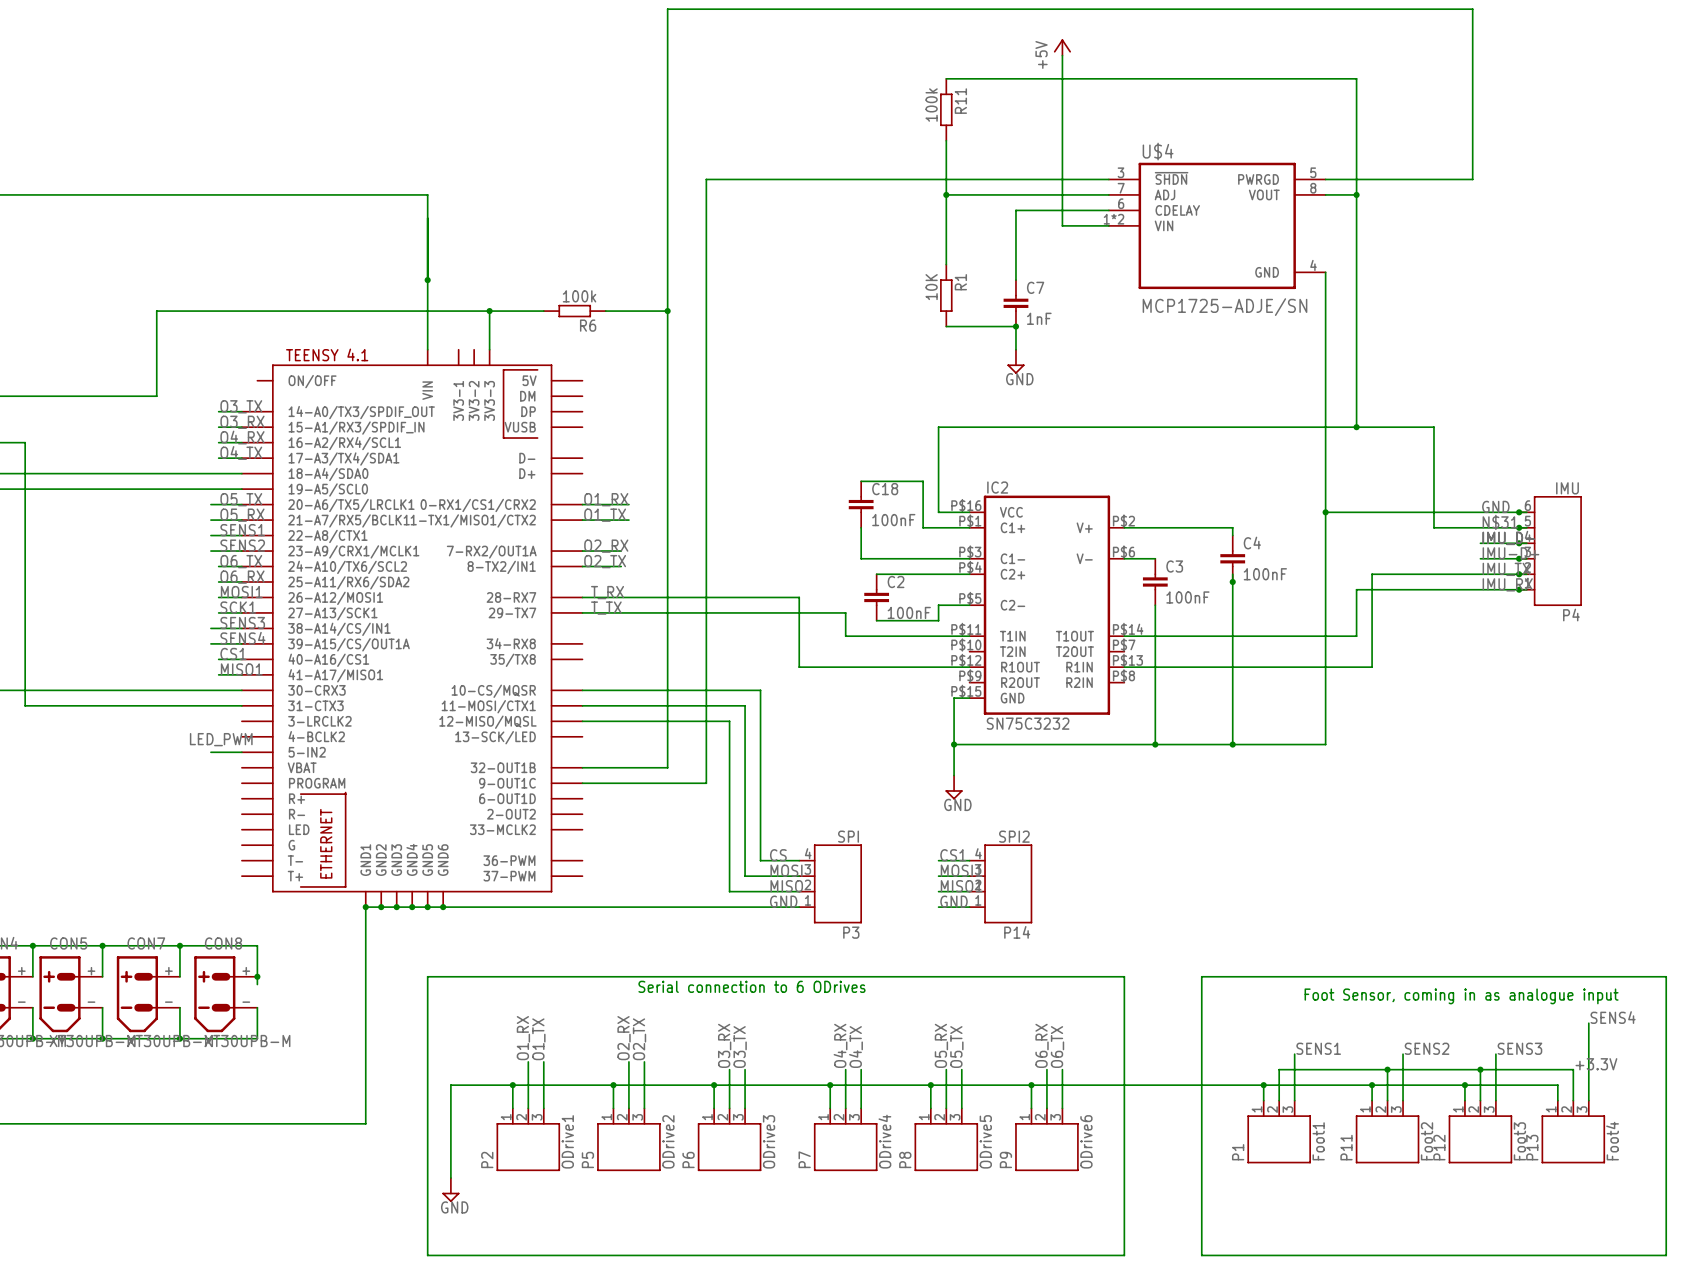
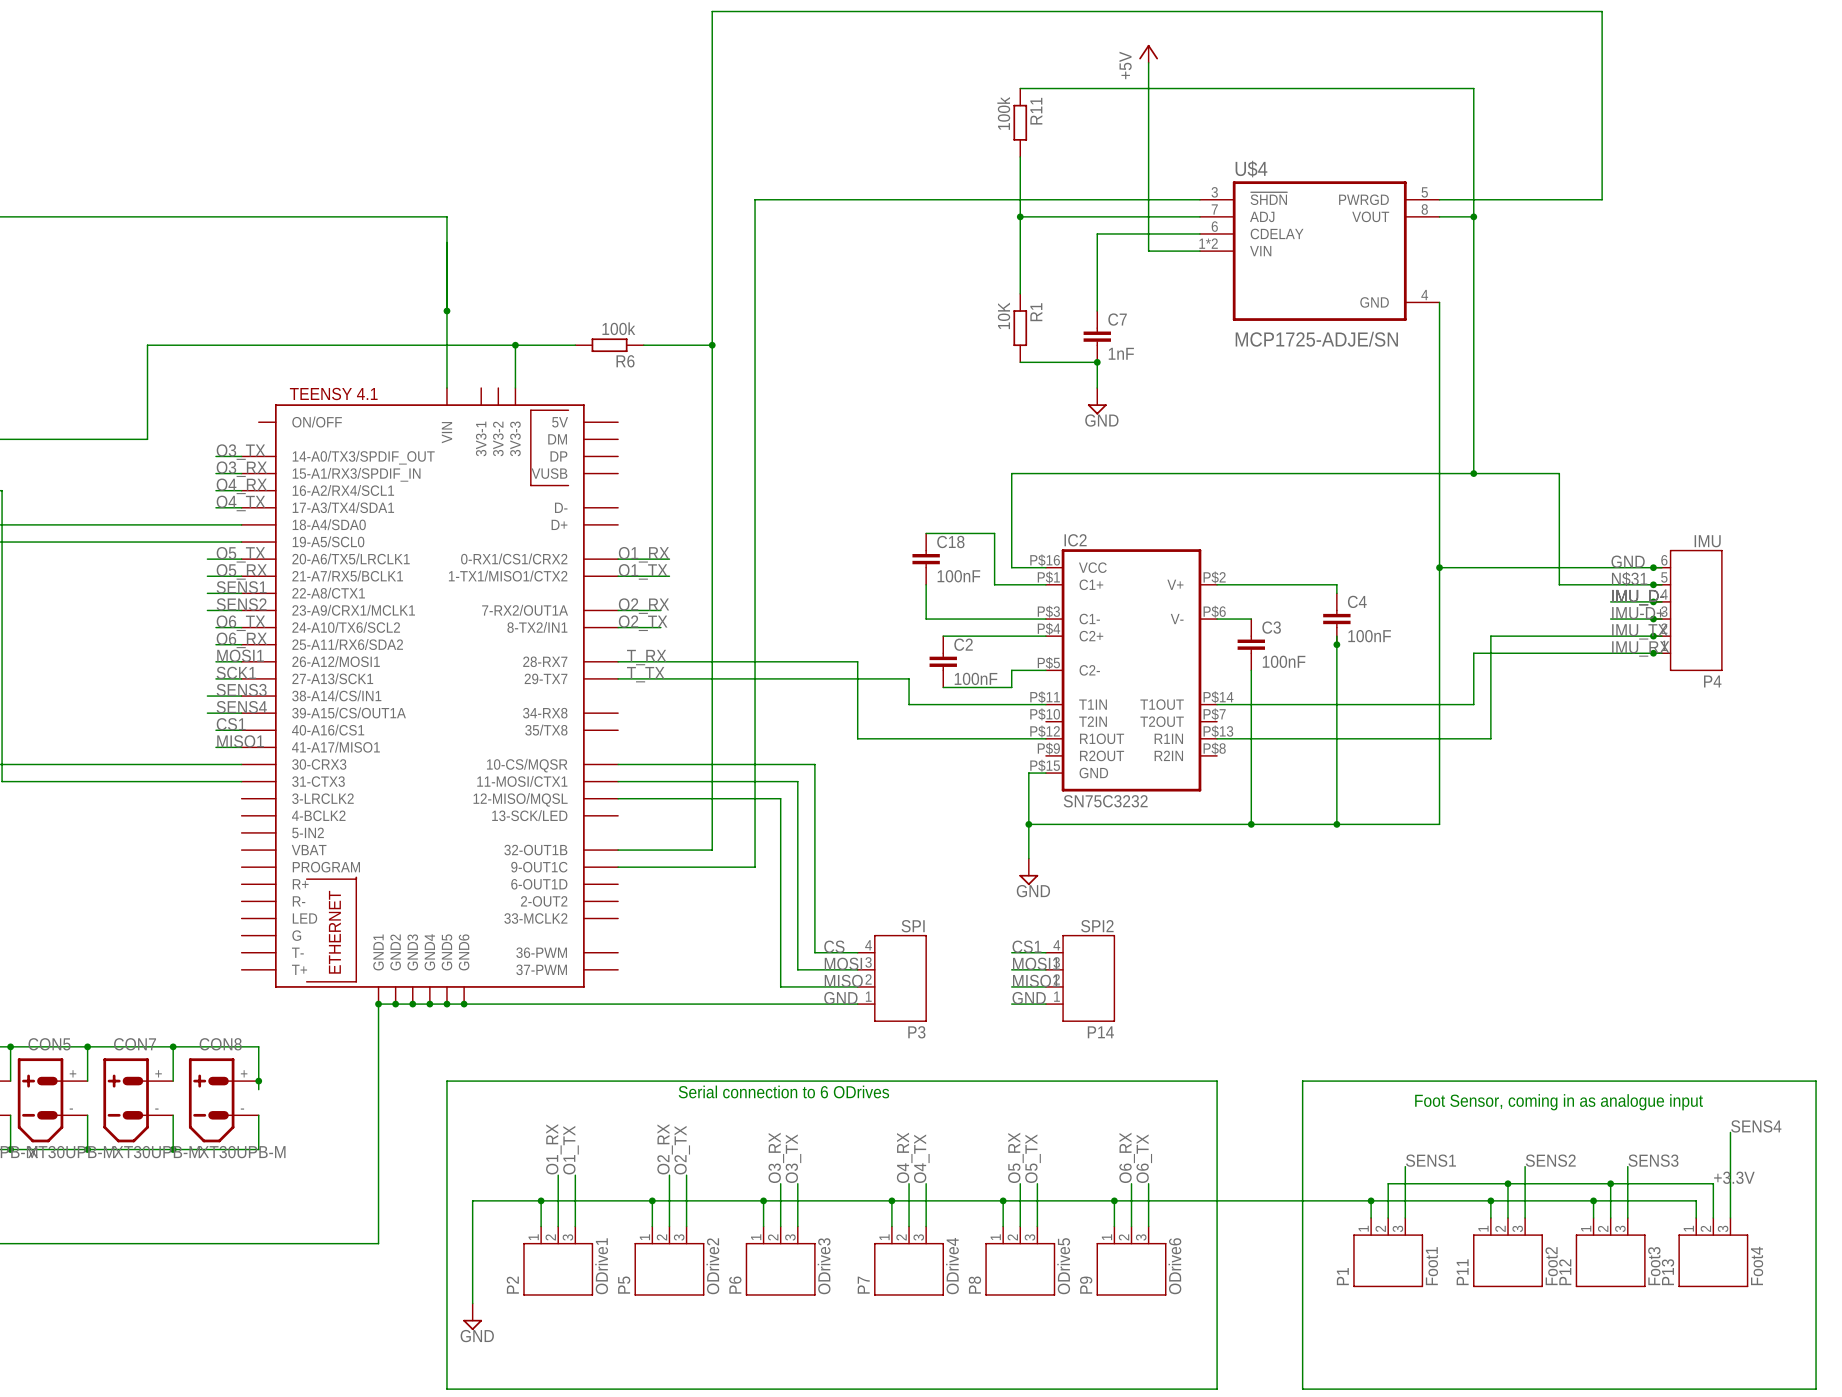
label: LED_PWM (221, 739) -> none
wire: (210, 752) (241, 752) -> none

